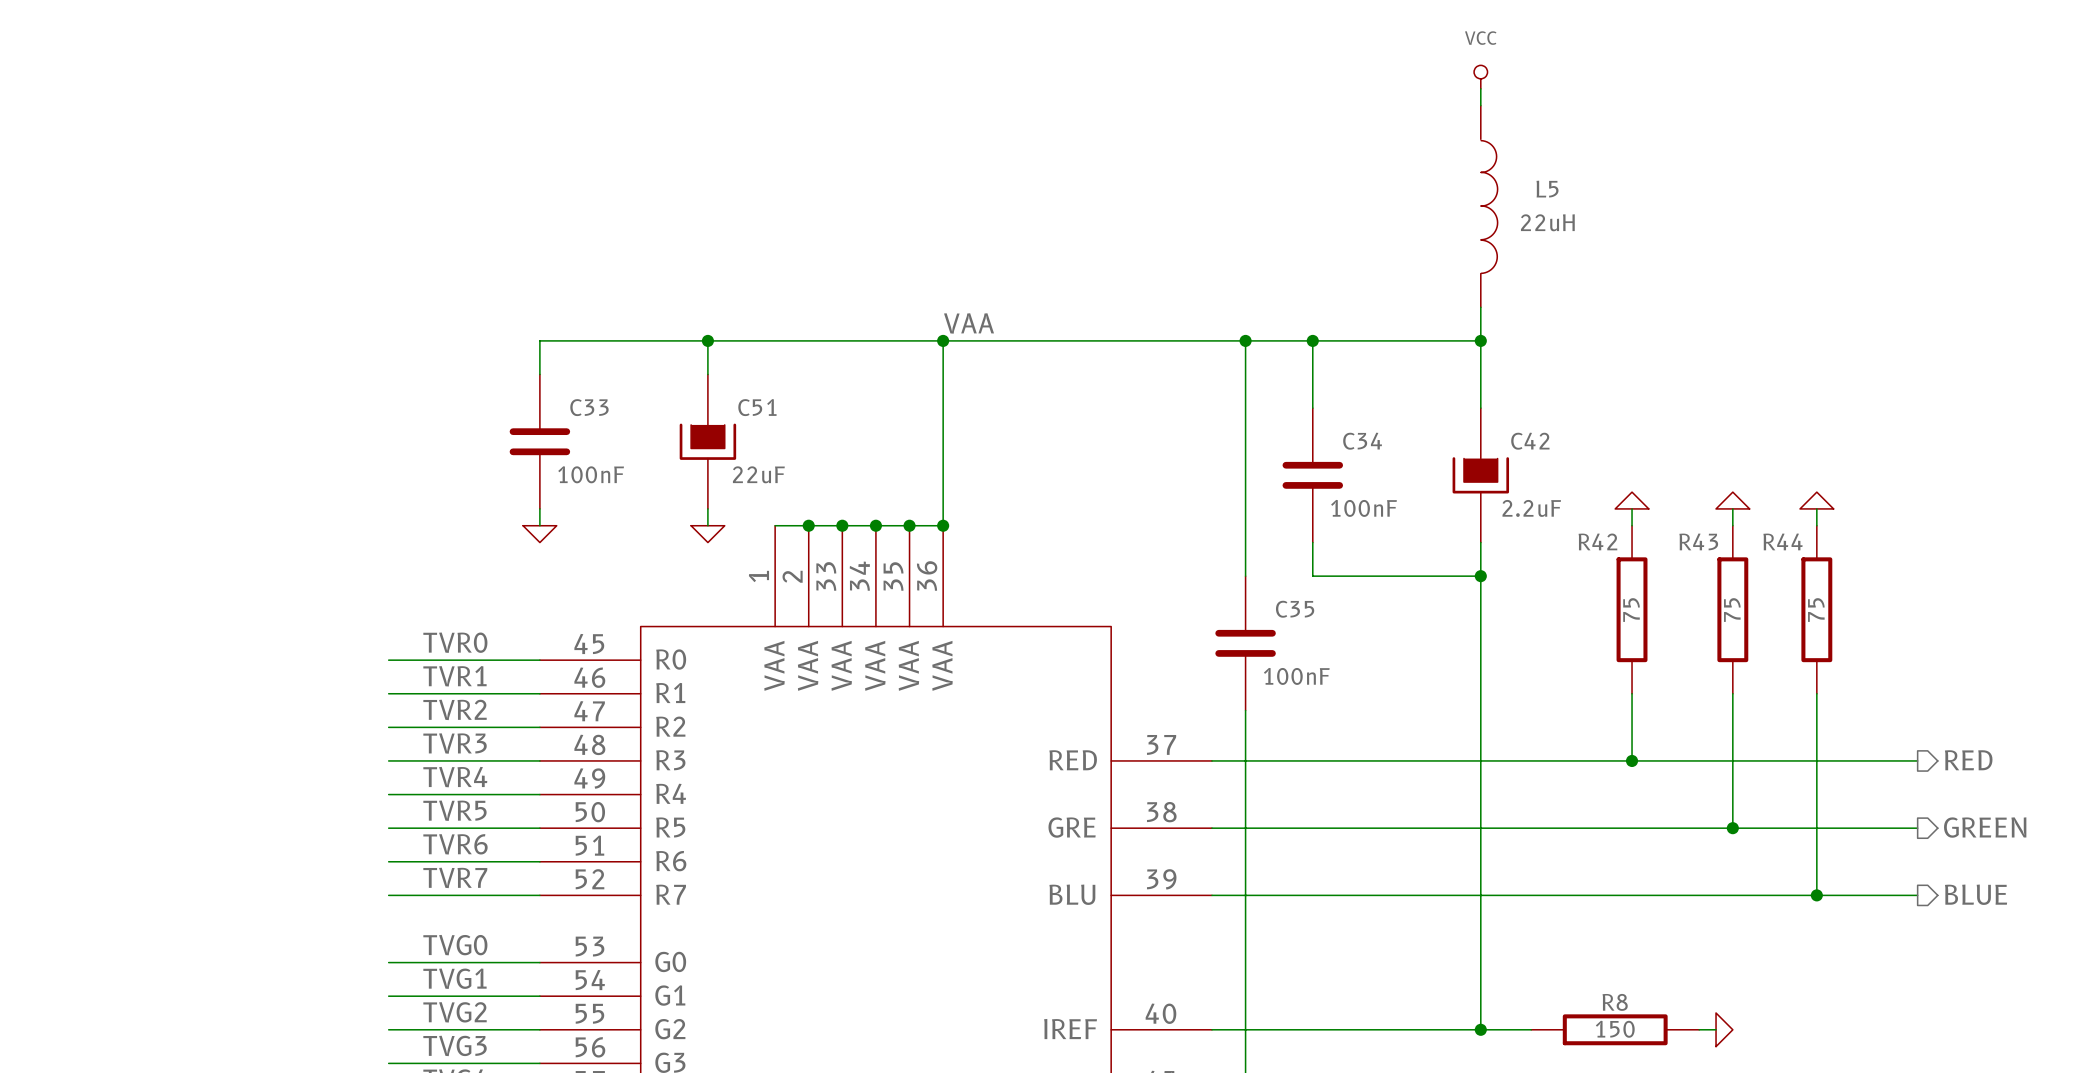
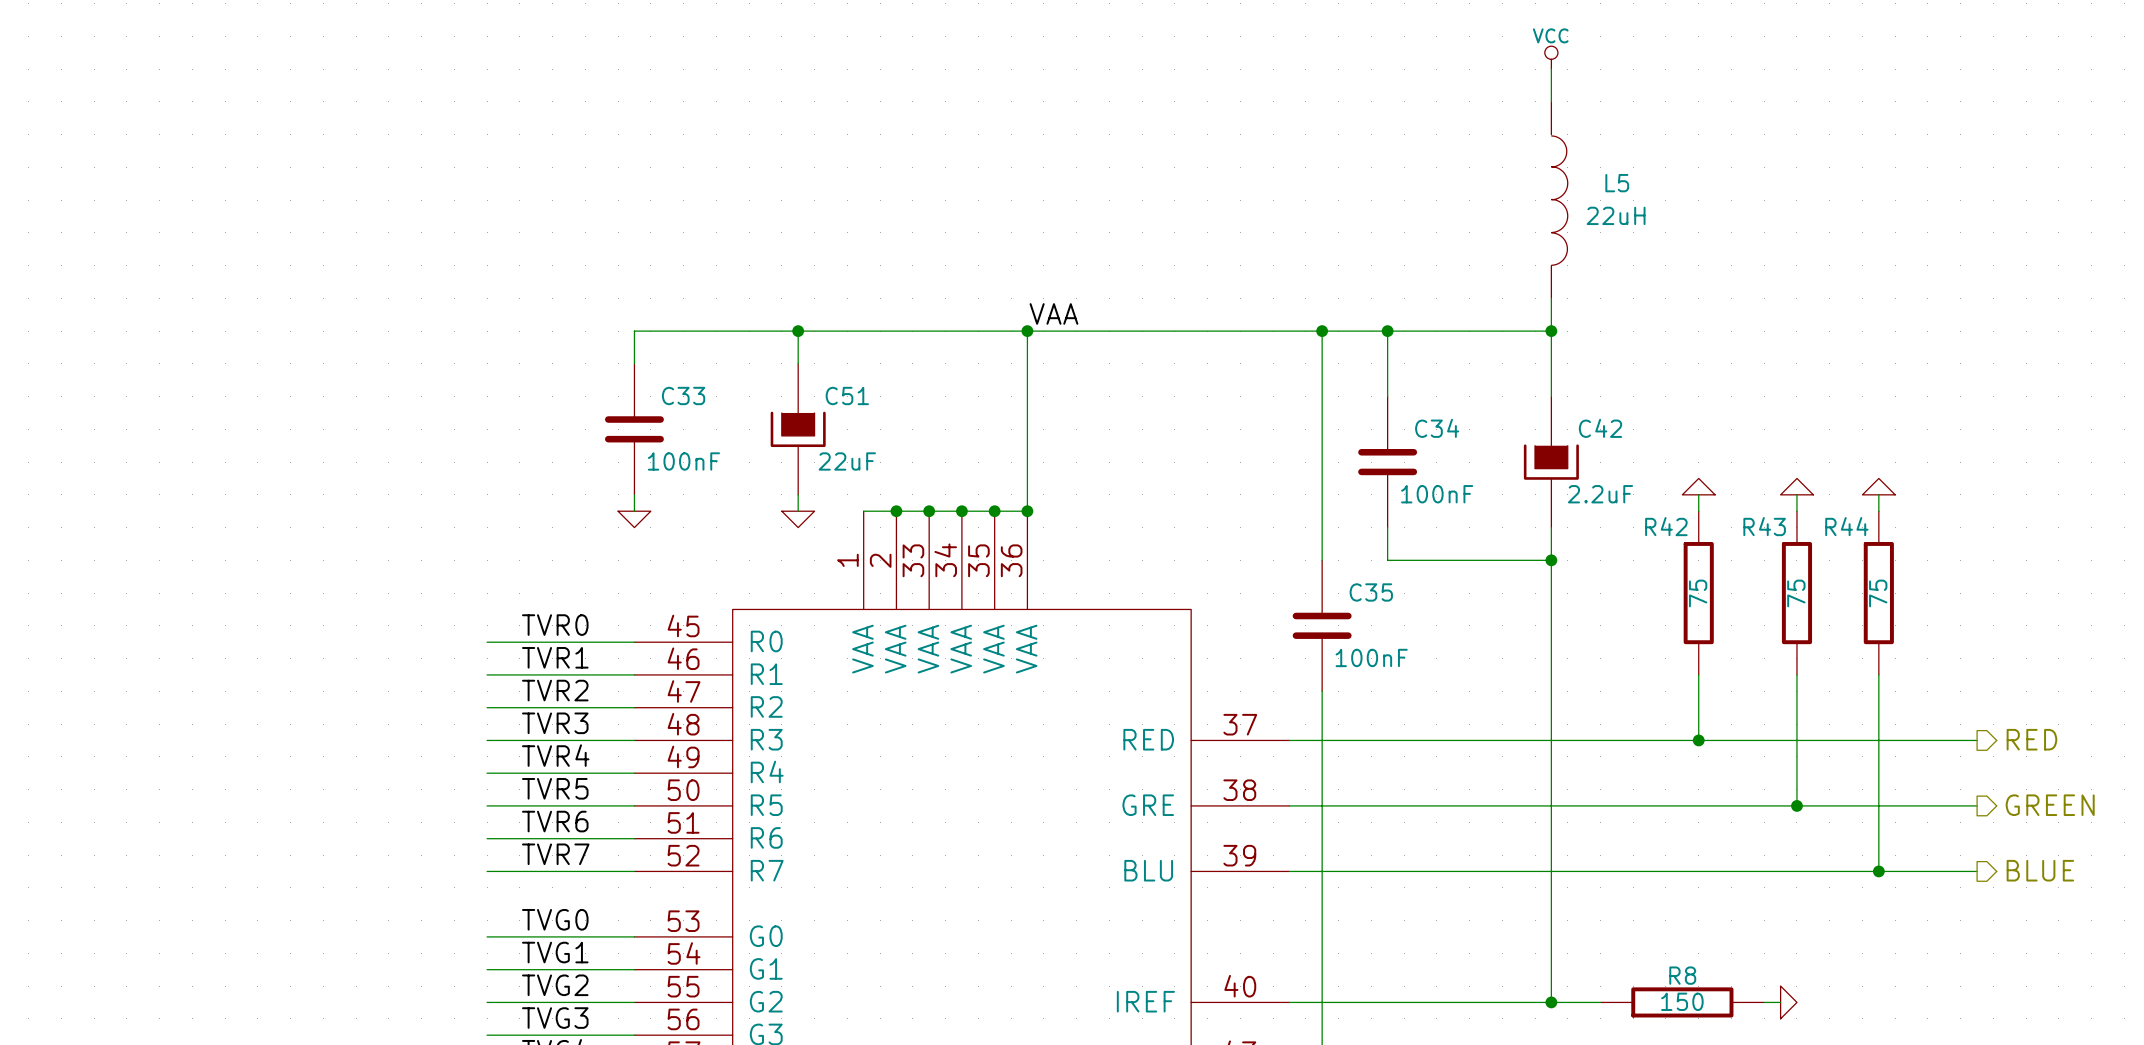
power symbol position: VCC (1480, 77) -> VCC (1551, 57)

